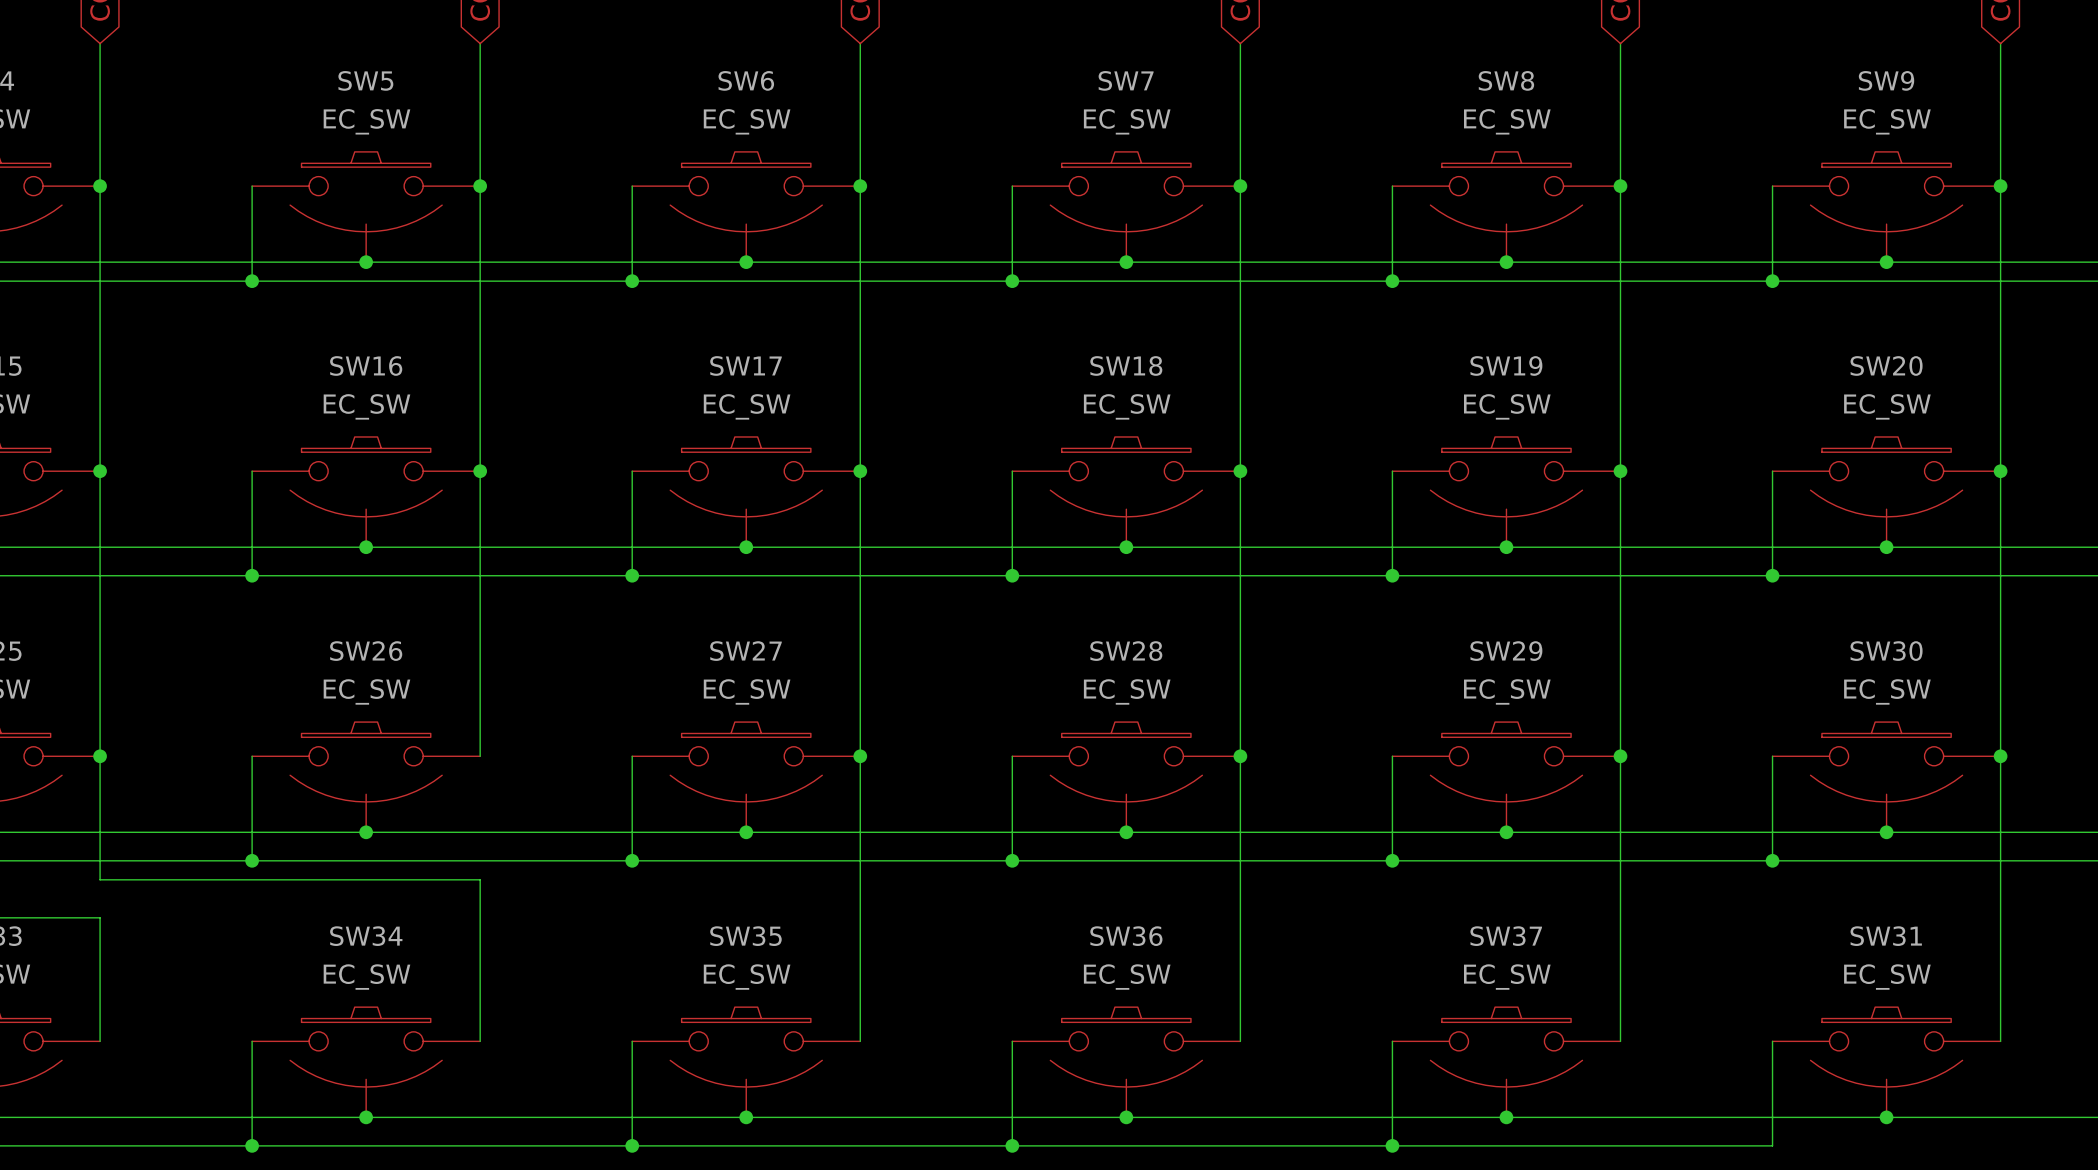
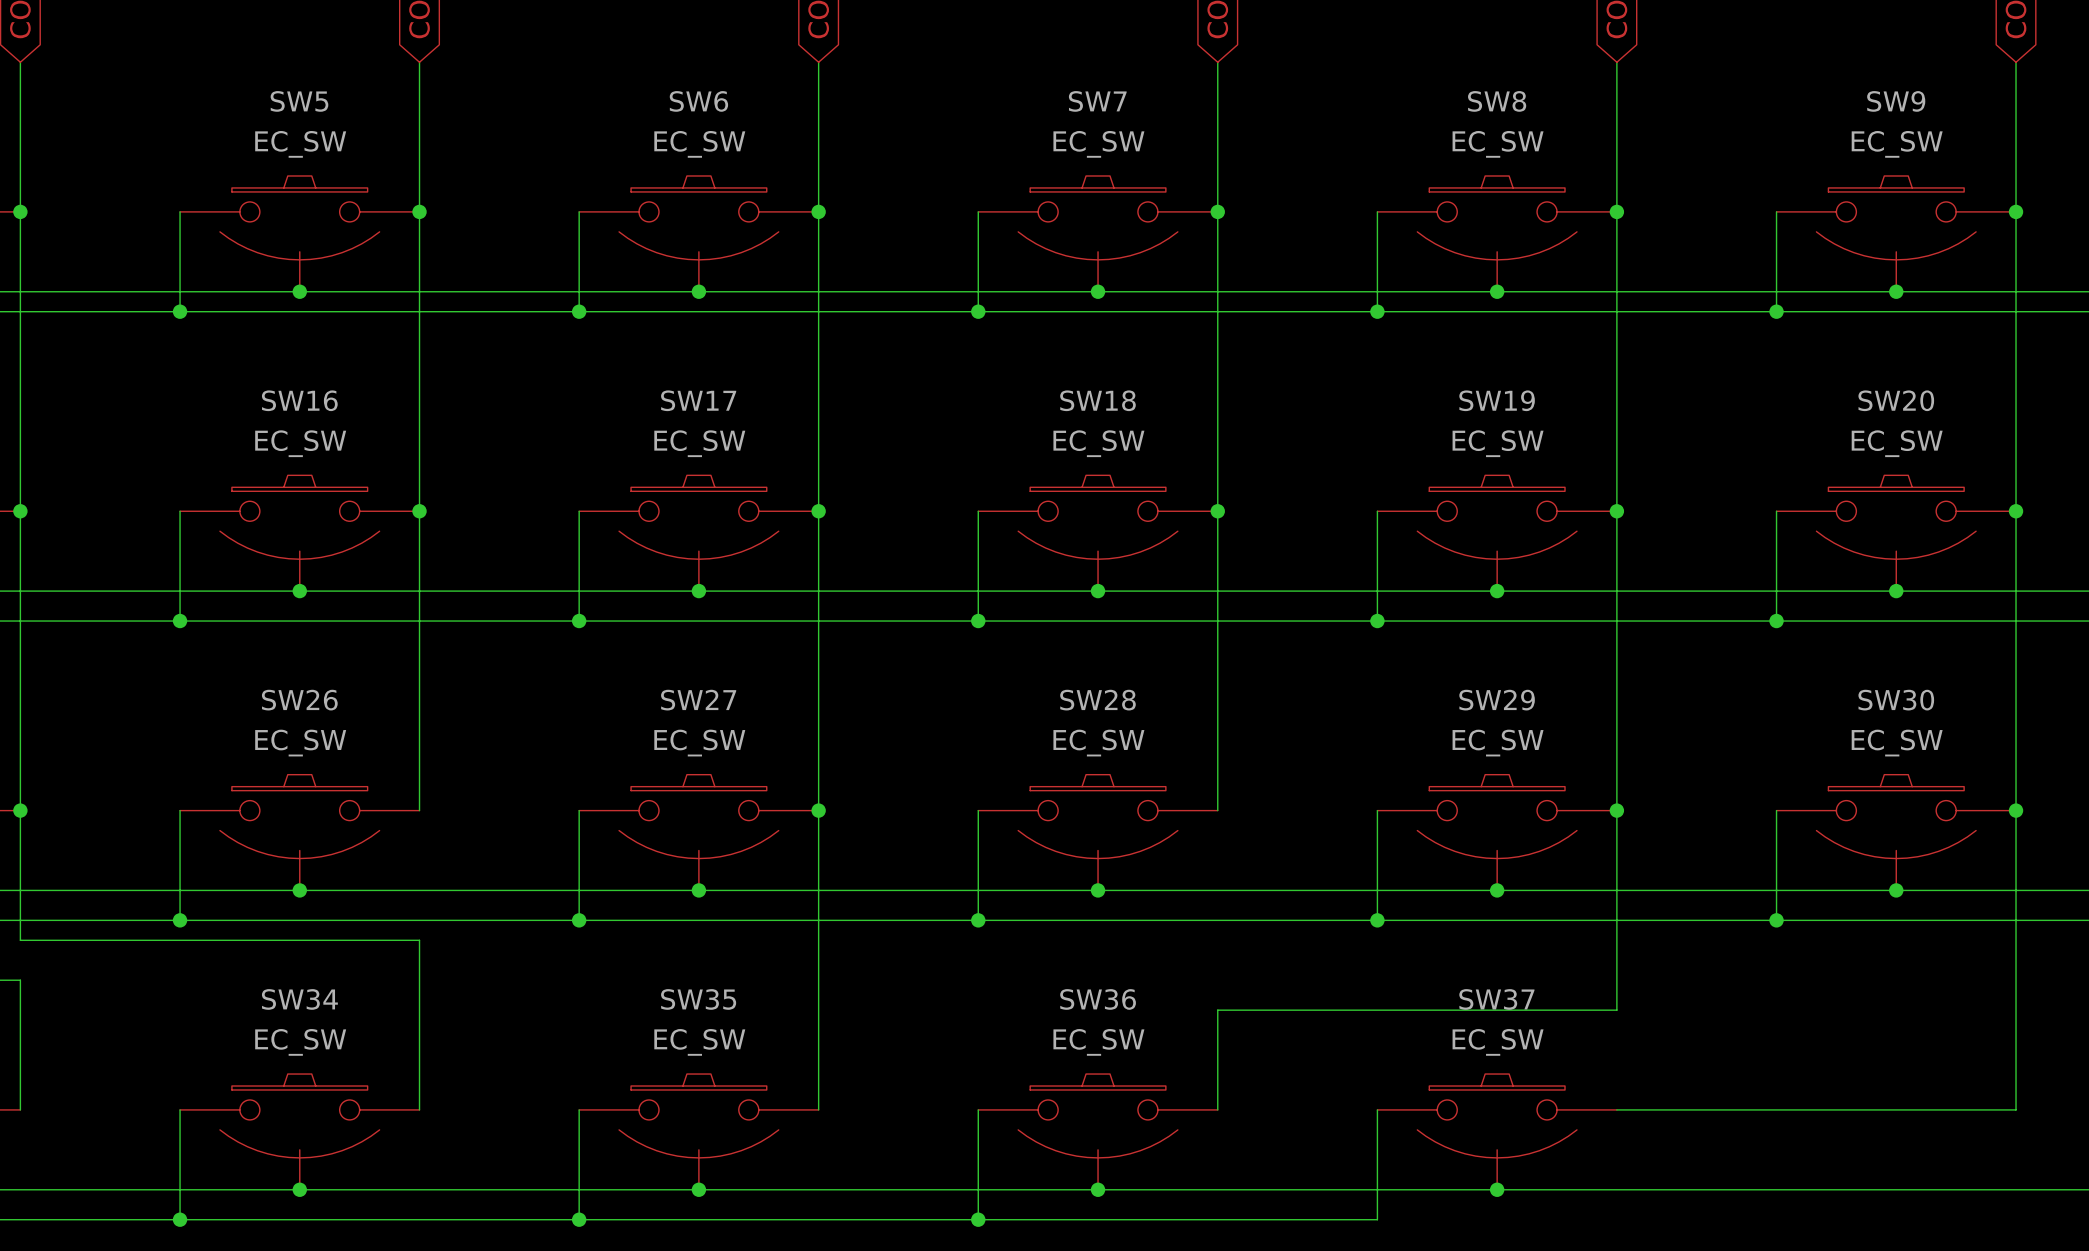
wire: (1240, 756) (1240, 946) -> (1616, 1010) (1217, 1010)
junction: (1240, 756) -> none
wire: (1620, 946) (1620, 1041) -> (2016, 1109) (1616, 1109)
wire: (1772, 1041) (1772, 1145) (1392, 1145) -> none
SW31: EC_SW (1886, 1062) -> none
junction: (1886, 1117) -> none
junction: (1392, 1145) -> none

